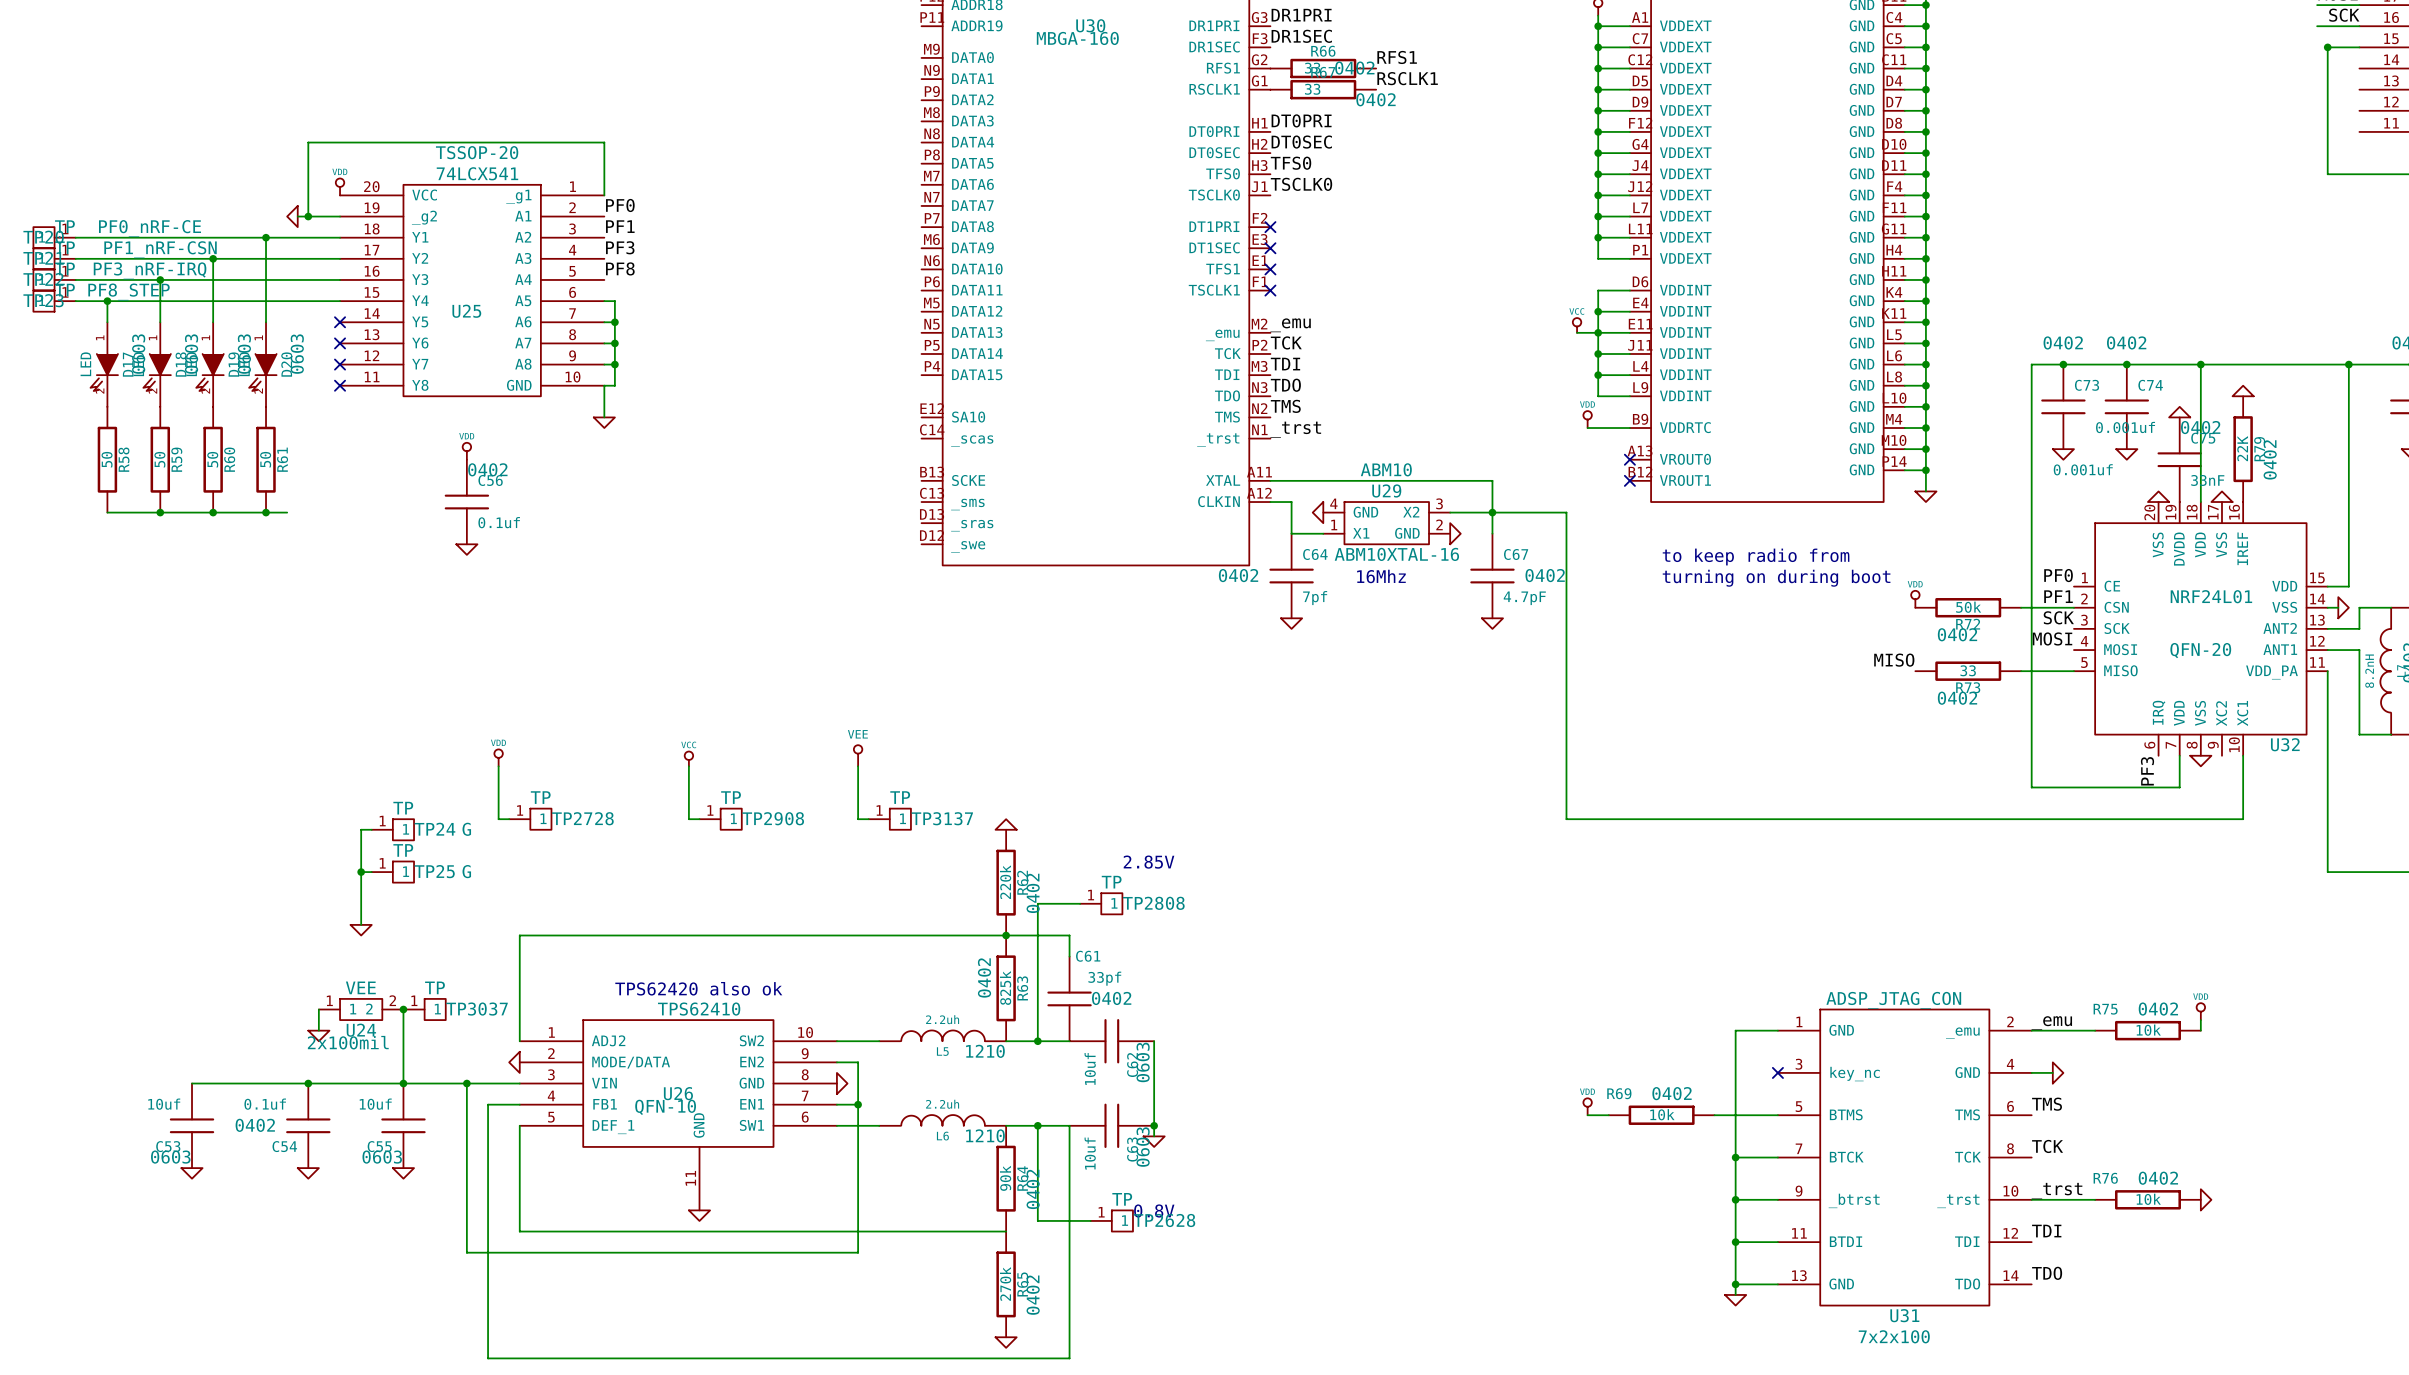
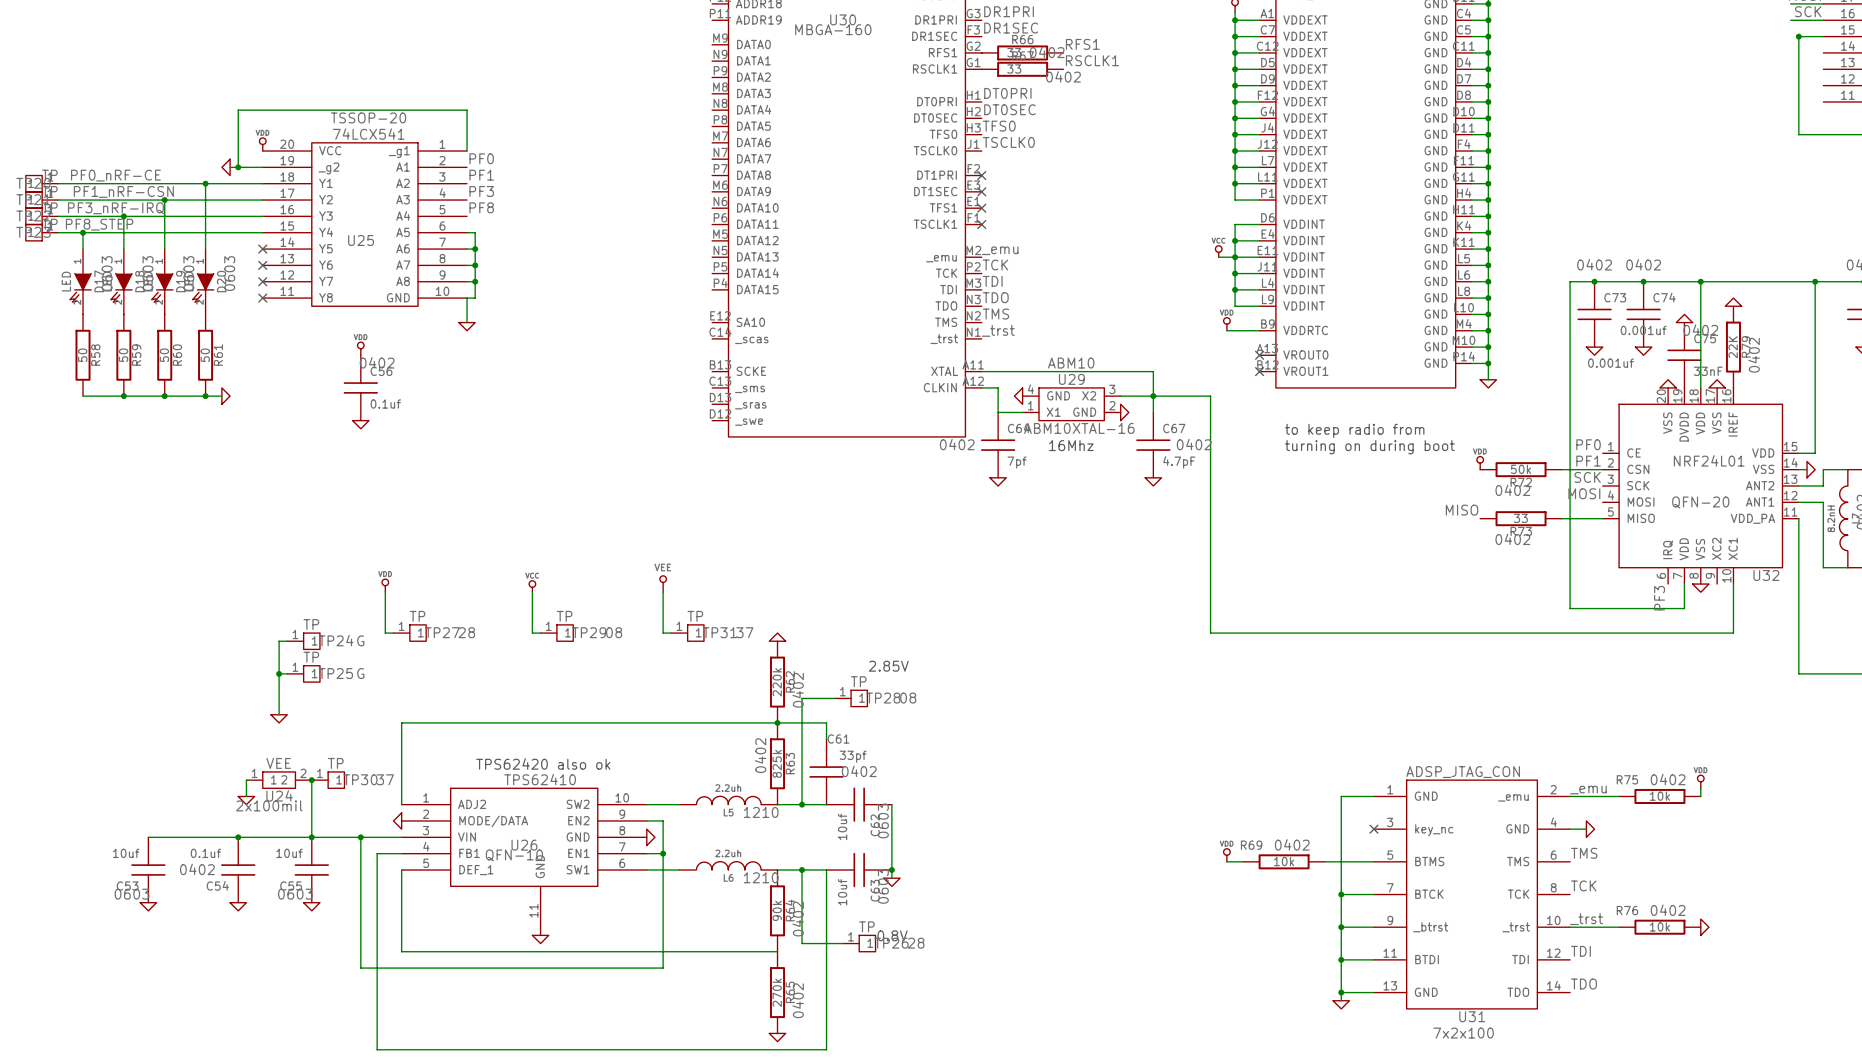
power symbol: none -> (226, 396)

